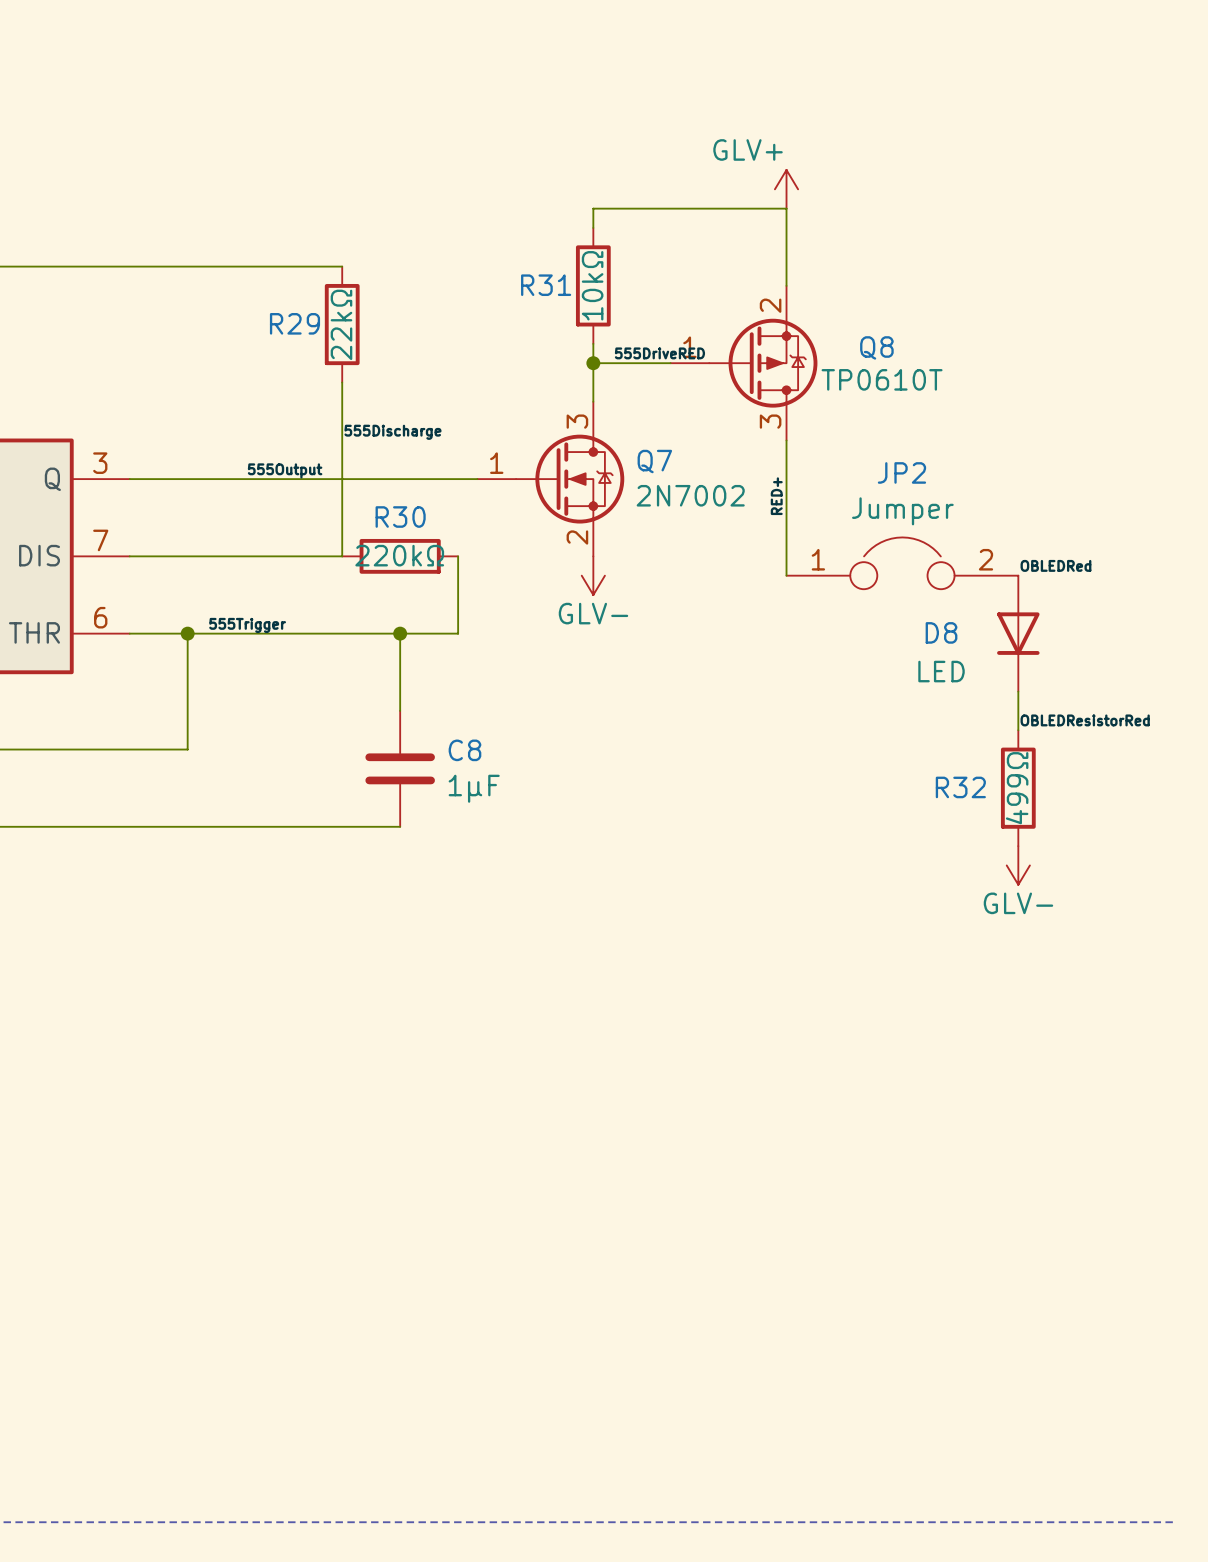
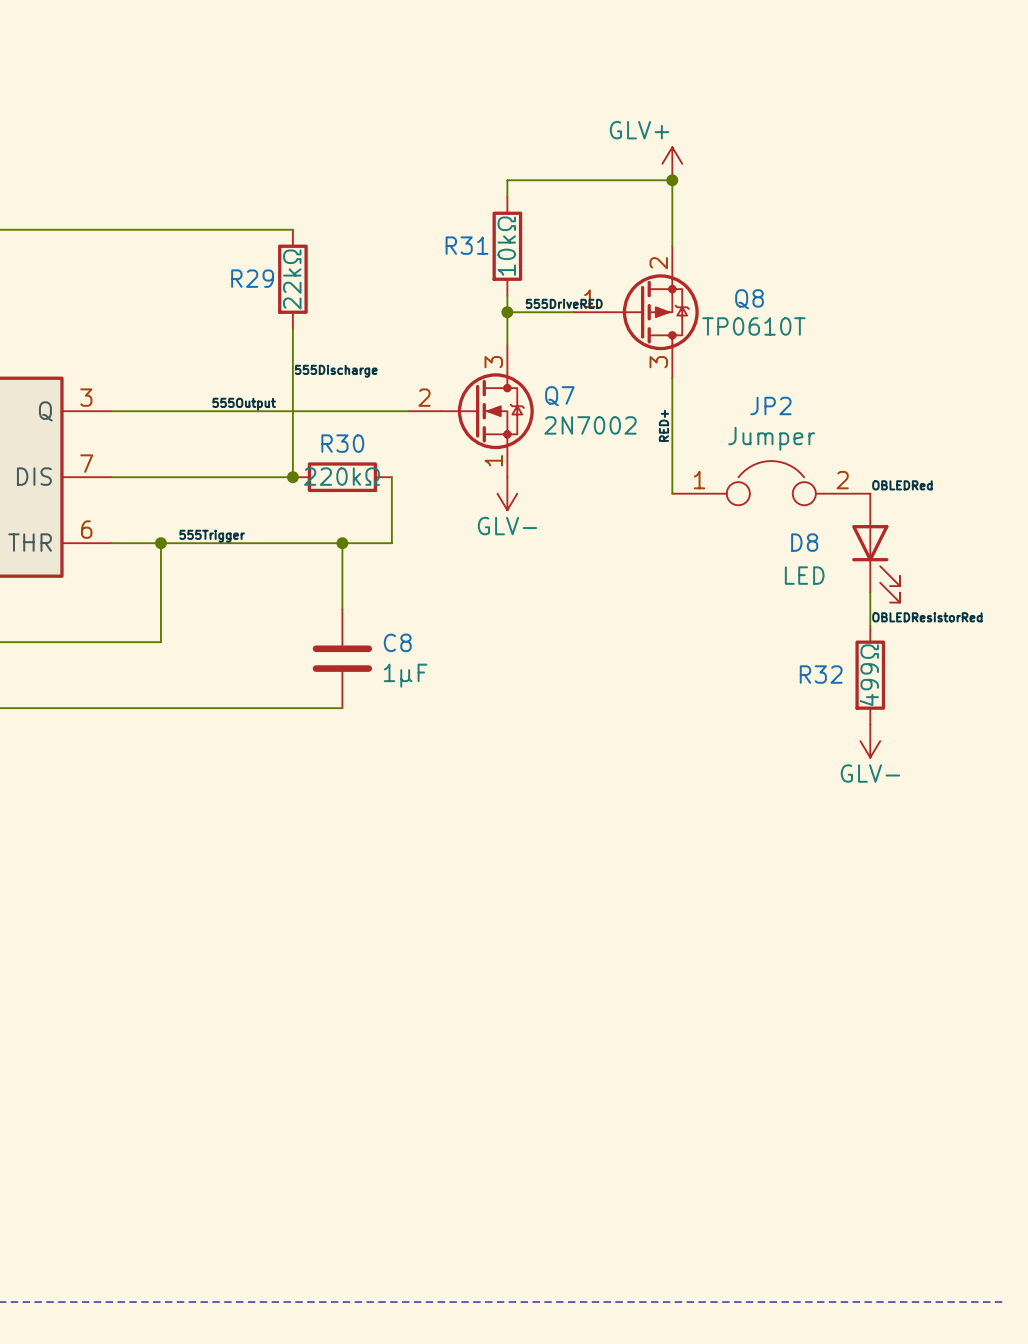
junction: none -> (672, 180)
Q7 pin number: 1 (496, 463) -> 2 (424, 397)
Q7 pin number: 2 (577, 537) -> 1 (493, 460)
junction: none -> (292, 477)
D8 symbol: [997, 575, 1040, 692] -> [852, 493, 900, 603]

